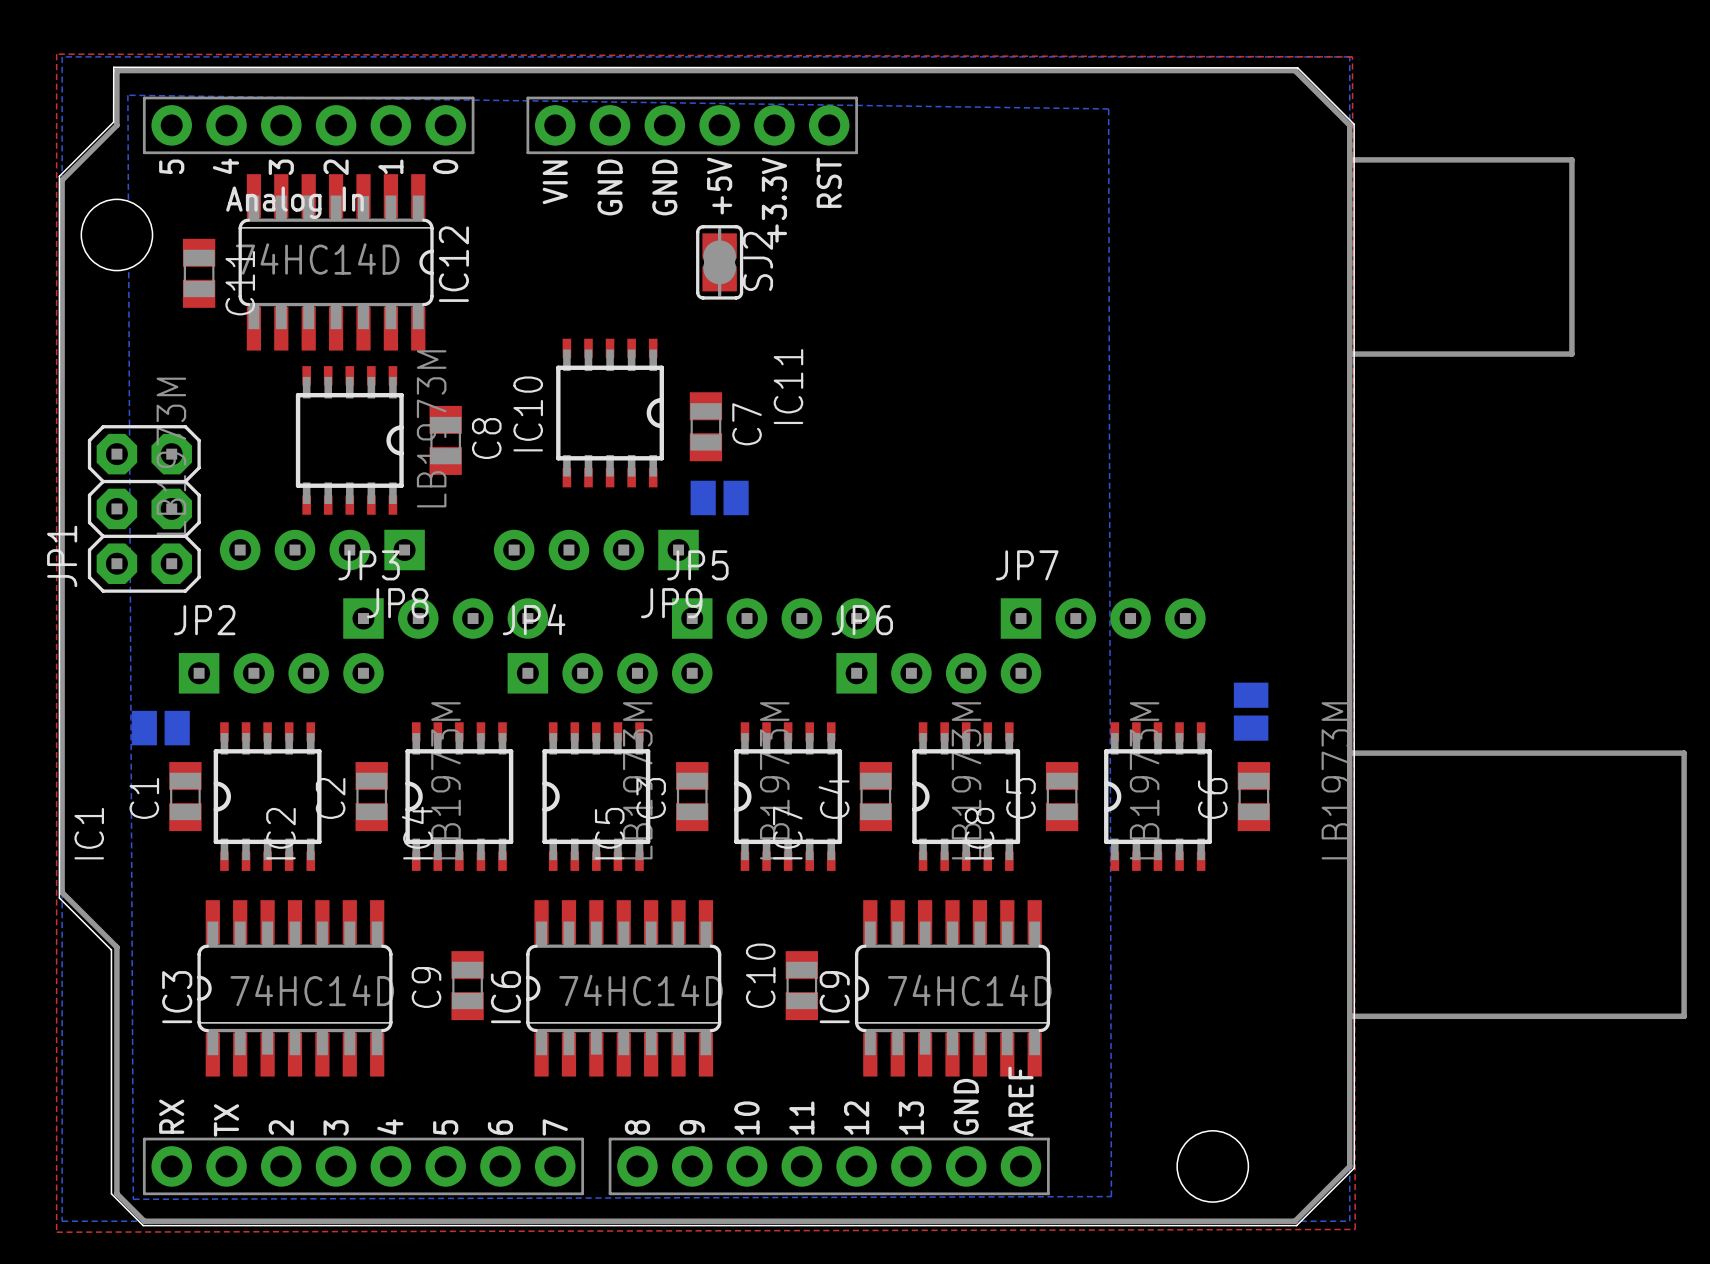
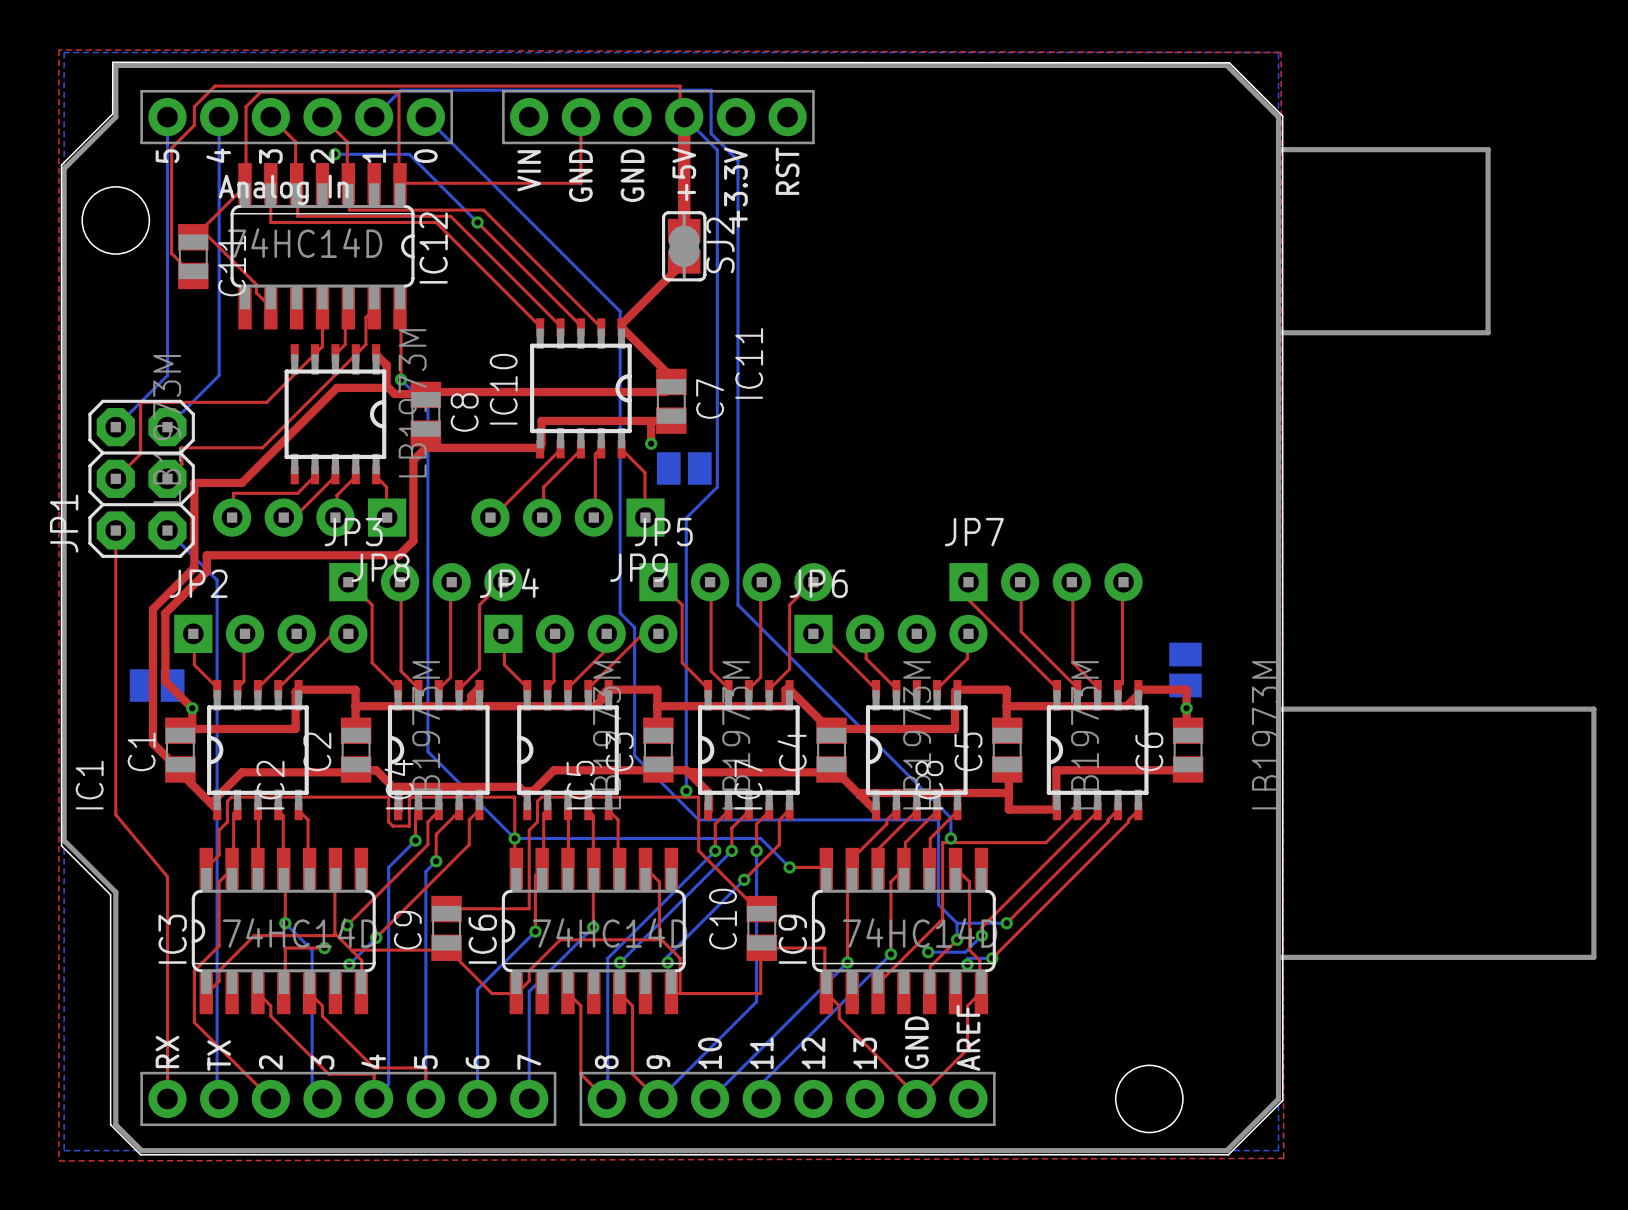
bottom zone outline: (127, 95) (133, 1199) (1111, 1196) (1108, 108) (127, 95) -> none
bottom track: none -> (167, 117) (167, 375) (115, 427)
bottom track: none -> (219, 117) (219, 375) (167, 427)
top track: none -> (270, 117) (295, 141) (297, 216) (450, 216) (560, 327)
top track: none -> (322, 117) (347, 141) (349, 210) (483, 210) (601, 327)
bottom track: none -> (374, 117) (401, 90) (711, 90) (711, 133) (737, 160) (737, 604) (950, 817) (950, 838)
bottom track: none -> (425, 117) (620, 311) (620, 613) (634, 627) (634, 755) (698, 819) (938, 819) (938, 904) (957, 923)
top track: none -> (580, 117) (580, 183) (400, 183) (398, 92) (260, 92) (246, 106) (246, 183) (193, 237) (202, 230) (256, 284) (256, 292) (270, 308)
bottom track: none -> (684, 117) (717, 150) (717, 487) (686, 518) (686, 790)
bottom track: none -> (334, 154) (409, 154) (477, 222)
via: none -> (334, 154)
top track: none -> (270, 183) (270, 222) (436, 222) (540, 327)
top track: none -> (477, 222) (580, 327)
via: none -> (477, 222)
top track: none -> (684, 230) (684, 117) (680, 112) (680, 86) (215, 86) (194, 106) (194, 125) (171, 148) (171, 253) (193, 275)
top track: none -> (684, 261) (622, 323) (621, 327) (669, 375) (671, 381) (665, 381) (665, 392) (427, 392) (425, 394) (394, 394) (386, 385)
top track: none -> (322, 308) (322, 346) (266, 402) (140, 402) (140, 454) (115, 478)
top track: none -> (348, 308) (345, 311) (345, 344) (335, 353)
top track: none -> (374, 308) (365, 317) (365, 344) (262, 447) (181, 447) (181, 464) (167, 478)
top track: none -> (400, 308) (401, 379)
top track: none -> (376, 353) (386, 365) (386, 385)
bottom track: none -> (401, 379) (427, 406) (427, 751) (514, 838) (760, 838) (789, 867)
via: none -> (401, 379)
top track: none -> (386, 385) (384, 387) (336, 387) (241, 482) (194, 482) (194, 567) (153, 609) (153, 743) (181, 770) (181, 774) (217, 811)
top track: none -> (651, 420) (651, 443)
top track: none -> (671, 420) (541, 420) (540, 449) (425, 447)
via: none -> (651, 443)
top track: none -> (425, 447) (413, 460) (413, 540) (398, 555) (206, 555) (206, 571) (165, 613) (165, 681) (192, 708) (192, 726) (180, 730) (181, 728) (295, 728) (295, 691) (298, 689) (355, 689) (356, 730)
top track: none -> (560, 449) (490, 517)
top track: none -> (580, 449) (543, 487) (542, 517)
top track: none -> (601, 449) (595, 454) (595, 516) (593, 517)
top track: none -> (621, 449) (644, 472) (645, 517)
top track: none -> (315, 475) (297, 493) (233, 493) (232, 517)
top track: none -> (335, 475) (295, 516) (283, 517)
top track: none -> (355, 475) (336, 495) (335, 517)
top track: none -> (376, 475) (386, 487) (387, 517)
top track: none -> (115, 530) (115, 814) (167, 876) (167, 1098)
bottom track: none -> (167, 530) (217, 580) (217, 1096) (219, 1098)
top track: none -> (348, 582) (372, 604) (372, 662) (398, 689)
top track: none -> (400, 582) (401, 671) (418, 689)
top track: none -> (451, 582) (450, 677) (438, 689)
top track: none -> (503, 582) (479, 604) (479, 669) (459, 689)
top track: none -> (658, 582) (682, 604) (682, 662) (708, 689)
top track: none -> (710, 582) (711, 671) (728, 689)
top track: none -> (761, 582) (760, 677) (748, 689)
top track: none -> (813, 582) (789, 604) (789, 669) (769, 689)
top track: none -> (968, 582) (969, 600) (1056, 689)
top track: none -> (1020, 582) (1021, 631) (1077, 689)
top track: none -> (1071, 582) (1072, 662) (1097, 689)
top track: none -> (1123, 582) (1122, 683) (1118, 689)
top track: none -> (193, 633) (194, 664) (217, 689)
top track: none -> (244, 633) (243, 681) (237, 689)
top track: none -> (296, 633) (295, 650) (257, 689)
top track: none -> (348, 633) (332, 633) (278, 689)
top track: none -> (503, 633) (504, 664) (527, 689)
top track: none -> (555, 633) (554, 681) (547, 689)
top track: none -> (606, 633) (605, 650) (567, 689)
top track: none -> (658, 633) (642, 633) (588, 689)
top track: none -> (813, 633) (820, 633) (876, 689)
top track: none -> (865, 633) (866, 658) (896, 689)
top track: none -> (968, 633) (967, 658) (937, 689)
top track: none -> (479, 689) (471, 695) (471, 702) (467, 706) (355, 706)
top track: none -> (469, 704) (471, 706) (595, 706) (608, 689) (657, 689) (658, 730)
top track: none -> (657, 706) (785, 706) (785, 689) (789, 689) (831, 731) (835, 728) (955, 728) (955, 691) (957, 689) (1006, 689) (1007, 730)
top track: none -> (1006, 706) (1126, 706) (1139, 693) (1138, 689) (1186, 689) (1188, 730)
via: none -> (192, 708)
via: none -> (1186, 708)
top track: none -> (1007, 769) (1008, 770) (1008, 809) (1056, 809) (1056, 811) (1056, 770) (1188, 769)
top track: none -> (690, 774) (692, 772) (828, 772) (833, 768) (876, 811)
top track: none -> (394, 788) (396, 786) (518, 786) (525, 793) (527, 790) (533, 790) (554, 770) (686, 770) (709, 793) (708, 811)
via: none -> (686, 790)
top track: none -> (1008, 793) (862, 793) (859, 795)
top track: none -> (210, 803) (241, 772) (353, 772) (356, 769) (376, 770) (398, 793) (398, 811)
top track: none -> (237, 811) (233, 813) (233, 867) (219, 881) (219, 945) (194, 970) (194, 1022) (270, 1098)
top track: none -> (257, 811) (257, 868)
top track: none -> (278, 811) (283, 815) (285, 923)
top track: none -> (298, 811) (308, 819) (308, 867) (309, 868)
top track: none -> (418, 811) (415, 813) (415, 840)
top track: none -> (438, 811) (427, 821) (427, 844) (347, 925)
top track: none -> (459, 811) (436, 834) (436, 861)
top track: none -> (479, 811) (469, 819) (469, 844) (376, 937)
top track: none -> (547, 811) (543, 813) (543, 867) (535, 875) (535, 931)
top track: none -> (567, 811) (567, 868)
top track: none -> (588, 811) (593, 815) (593, 927)
top track: none -> (608, 811) (618, 819) (618, 867) (619, 868)
top track: none -> (728, 811) (715, 824) (715, 850)
top track: none -> (748, 811) (731, 828) (731, 850)
top track: none -> (769, 811) (756, 824) (756, 850)
top track: none -> (789, 811) (779, 819) (779, 844) (744, 879)
top track: none -> (896, 811) (886, 819) (886, 824) (853, 857) (853, 867) (847, 873) (847, 962)
top track: none -> (916, 811) (878, 848) (878, 868)
top track: none -> (937, 811) (905, 842) (905, 867) (890, 881) (890, 954)
top track: none -> (957, 811) (930, 838) (929, 868)
top track: none -> (1077, 811) (1045, 842) (942, 842) (942, 919) (878, 983) (878, 993)
top track: none -> (1097, 811) (981, 927) (981, 935)
top track: none -> (1118, 811) (1006, 923)
top track: none -> (1138, 811) (992, 958)
via: none -> (514, 838)
via: none -> (950, 838)
bottom track: none -> (415, 840) (388, 867) (388, 1084) (374, 1098)
via: none -> (415, 840)
bottom track: none -> (715, 850) (607, 958) (606, 1098)
via: none -> (715, 850)
bottom track: none -> (731, 850) (620, 962)
via: none -> (731, 850)
bottom track: none -> (756, 850) (756, 1001) (658, 1098)
via: none -> (756, 850)
bottom track: none -> (436, 861) (425, 871) (425, 1098)
via: none -> (436, 861)
top track: none -> (789, 867) (826, 868)
via: none -> (789, 867)
top track: none -> (206, 868) (219, 855) (219, 830) (227, 821) (227, 801) (231, 797) (388, 797) (388, 821) (392, 826) (409, 826) (409, 799) (411, 797) (514, 797) (514, 867) (516, 868)
top track: none -> (335, 868) (334, 935) (254, 935) (219, 970) (219, 981) (206, 993)
top track: none -> (645, 868) (659, 881) (659, 937) (680, 958) (680, 993)
top track: none -> (955, 868) (969, 881) (969, 950) (979, 960) (979, 993)
bottom track: none -> (744, 879) (667, 956) (667, 962)
via: none -> (744, 879)
top track: none -> (446, 908) (529, 908) (529, 830) (537, 821) (537, 801) (541, 797) (698, 797) (698, 850) (756, 908) (761, 909)
bottom track: none -> (285, 923) (312, 950) (312, 1088) (322, 1098)
via: none -> (285, 923)
bottom track: none -> (957, 923) (1006, 923)
bottom track: none -> (957, 923) (957, 939)
via: none -> (1006, 923)
via: none -> (347, 925)
bottom track: none -> (593, 927) (529, 991) (529, 1098)
via: none -> (593, 927)
bottom track: none -> (535, 931) (477, 989) (477, 1098)
via: none -> (535, 931)
top track: none -> (334, 933) (361, 960) (361, 993)
bottom track: none -> (981, 935) (965, 952) (928, 952)
via: none -> (981, 935)
bottom track: none -> (376, 937) (349, 964)
via: none -> (376, 937)
top track: none -> (660, 938) (560, 939) (529, 970) (529, 981) (516, 993) (492, 993) (446, 948)
top track: none -> (957, 939) (930, 966) (929, 993)
via: none -> (957, 939)
top track: none -> (324, 948) (285, 948) (285, 993) (283, 993)
via: none -> (324, 948)
top track: none -> (446, 947) (446, 950) (352, 951)
via: none -> (928, 952)
bottom track: none -> (890, 954) (762, 1082) (761, 1098)
via: none -> (890, 954)
bottom track: none -> (992, 958) (967, 958) (967, 964)
via: none -> (992, 958)
via: none -> (620, 962)
via: none -> (667, 962)
bottom track: none -> (847, 962) (710, 1098)
via: none -> (847, 962)
via: none -> (349, 964)
via: none -> (967, 964)
top track: none -> (257, 993) (270, 1005) (270, 1016) (328, 1074) (374, 1074) (374, 1098)
top track: none -> (309, 993) (322, 1005) (322, 1016) (374, 1067) (425, 1067) (425, 1098)
top track: none -> (567, 993) (580, 1005) (580, 1074) (606, 1098)
top track: none -> (619, 993) (632, 1005) (632, 1074) (658, 1098)
top track: none -> (671, 993) (760, 993) (760, 948) (824, 948) (824, 993) (839, 1005) (839, 1018) (917, 1096) (916, 1098) (967, 1049) (967, 1005) (979, 993)

